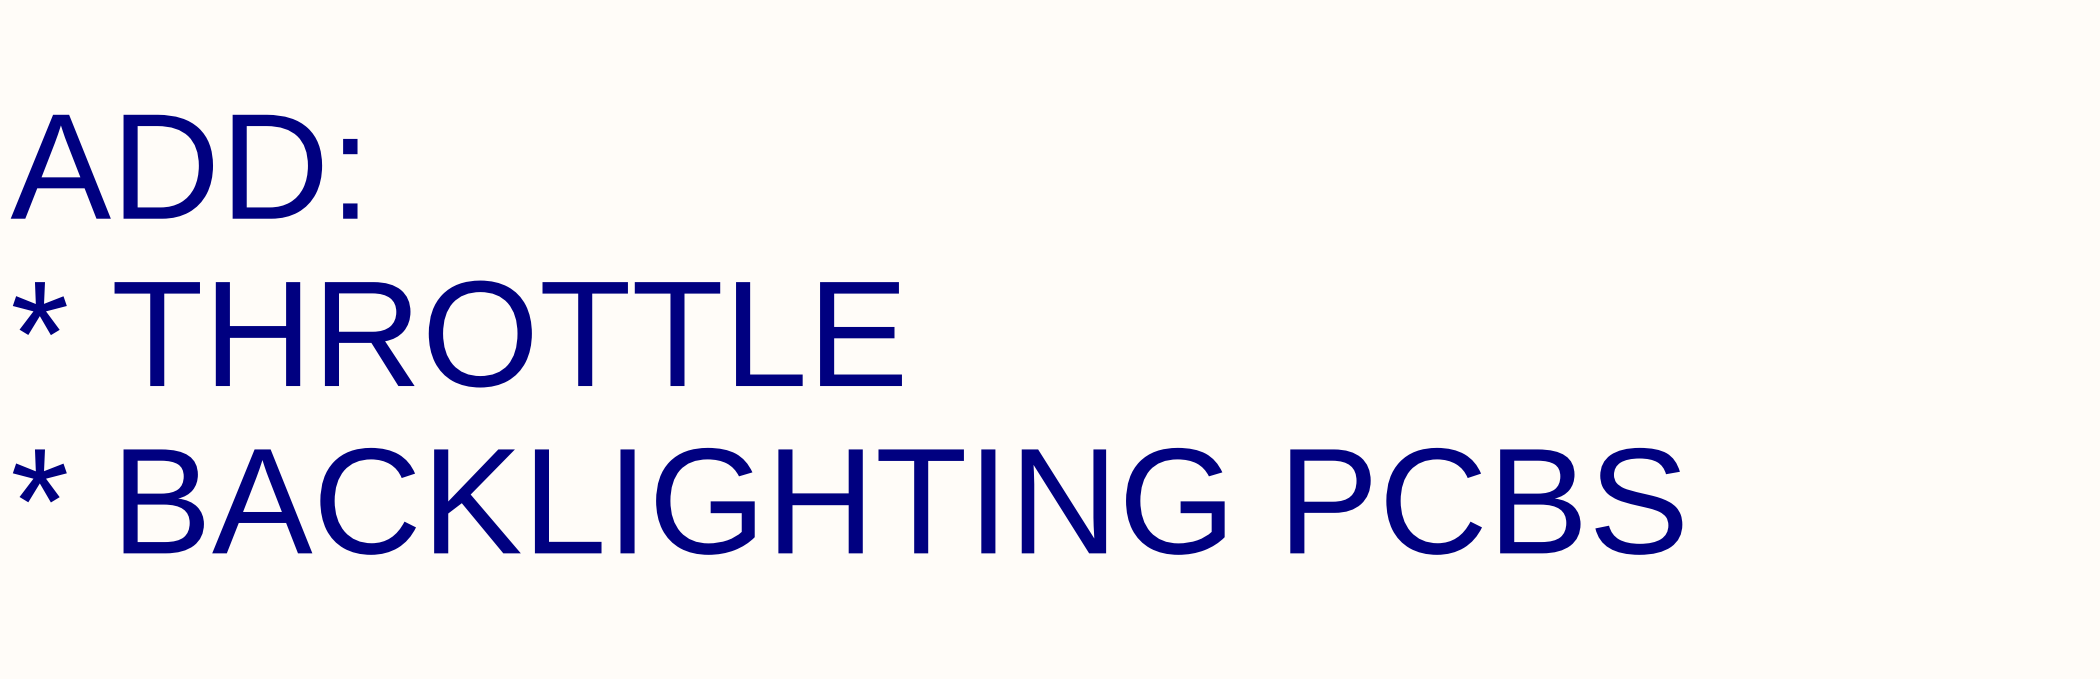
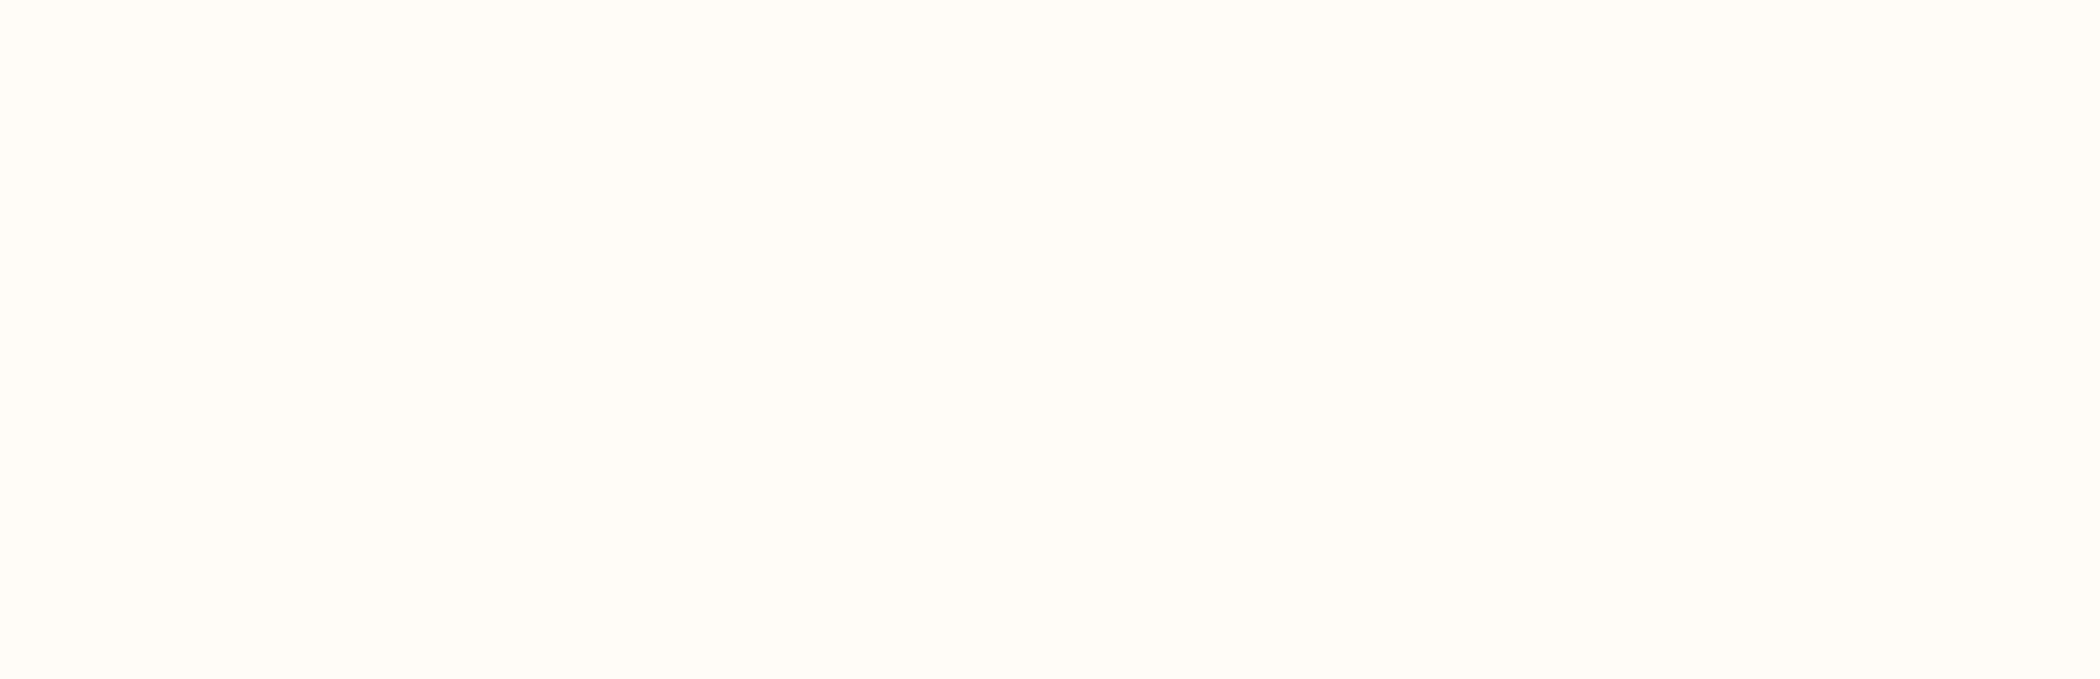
text: ADD: (184, 166) -> none
text: * THROTTLE (457, 334) -> none
text: * BACKLIGHTING PCBS (847, 501) -> none

